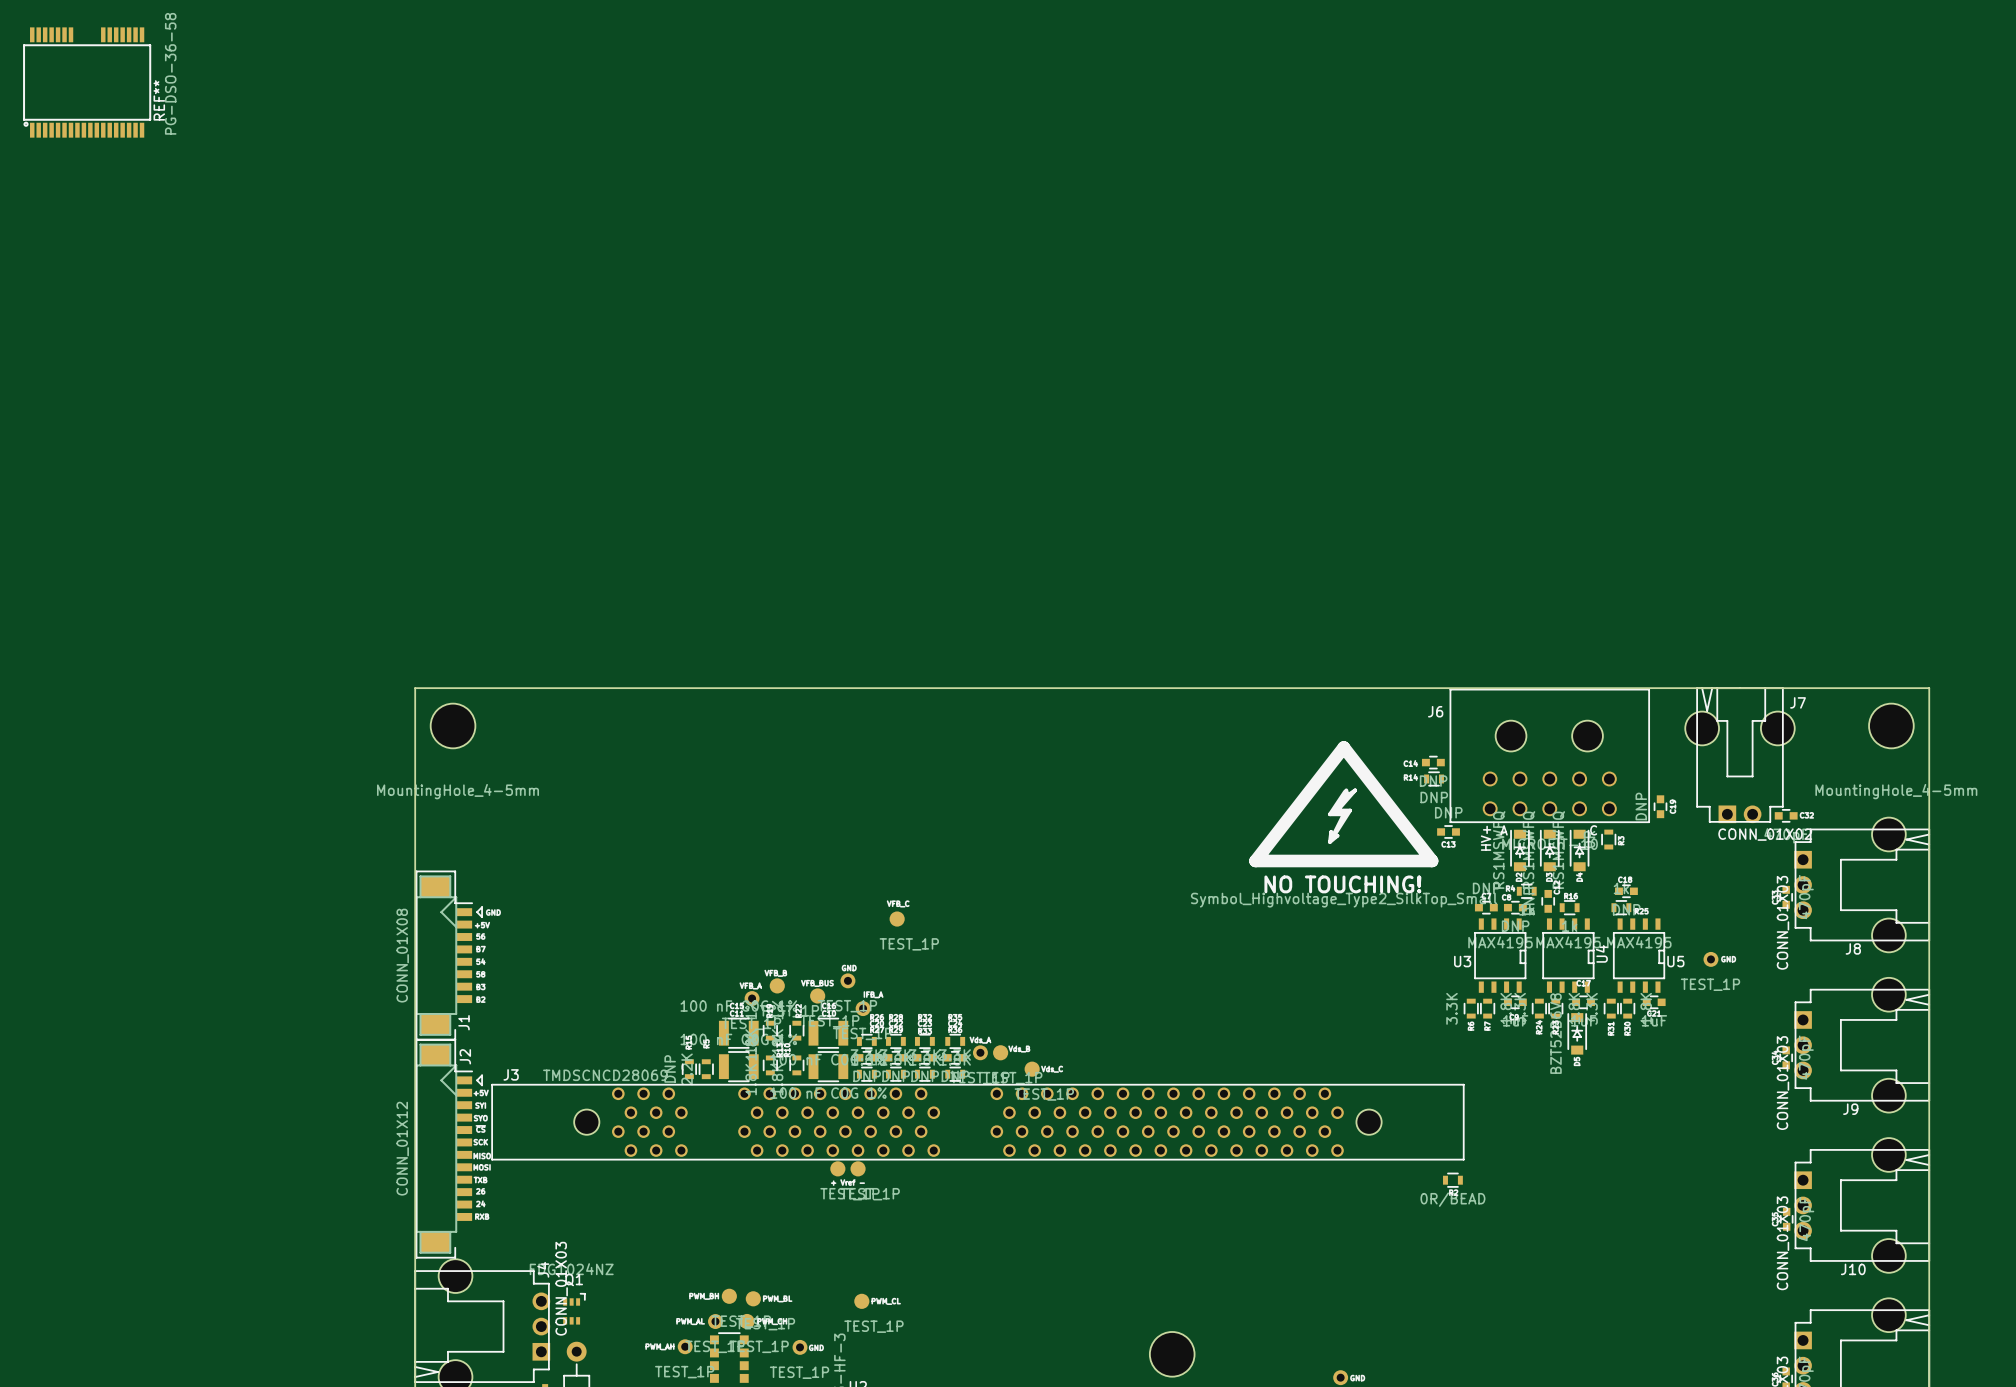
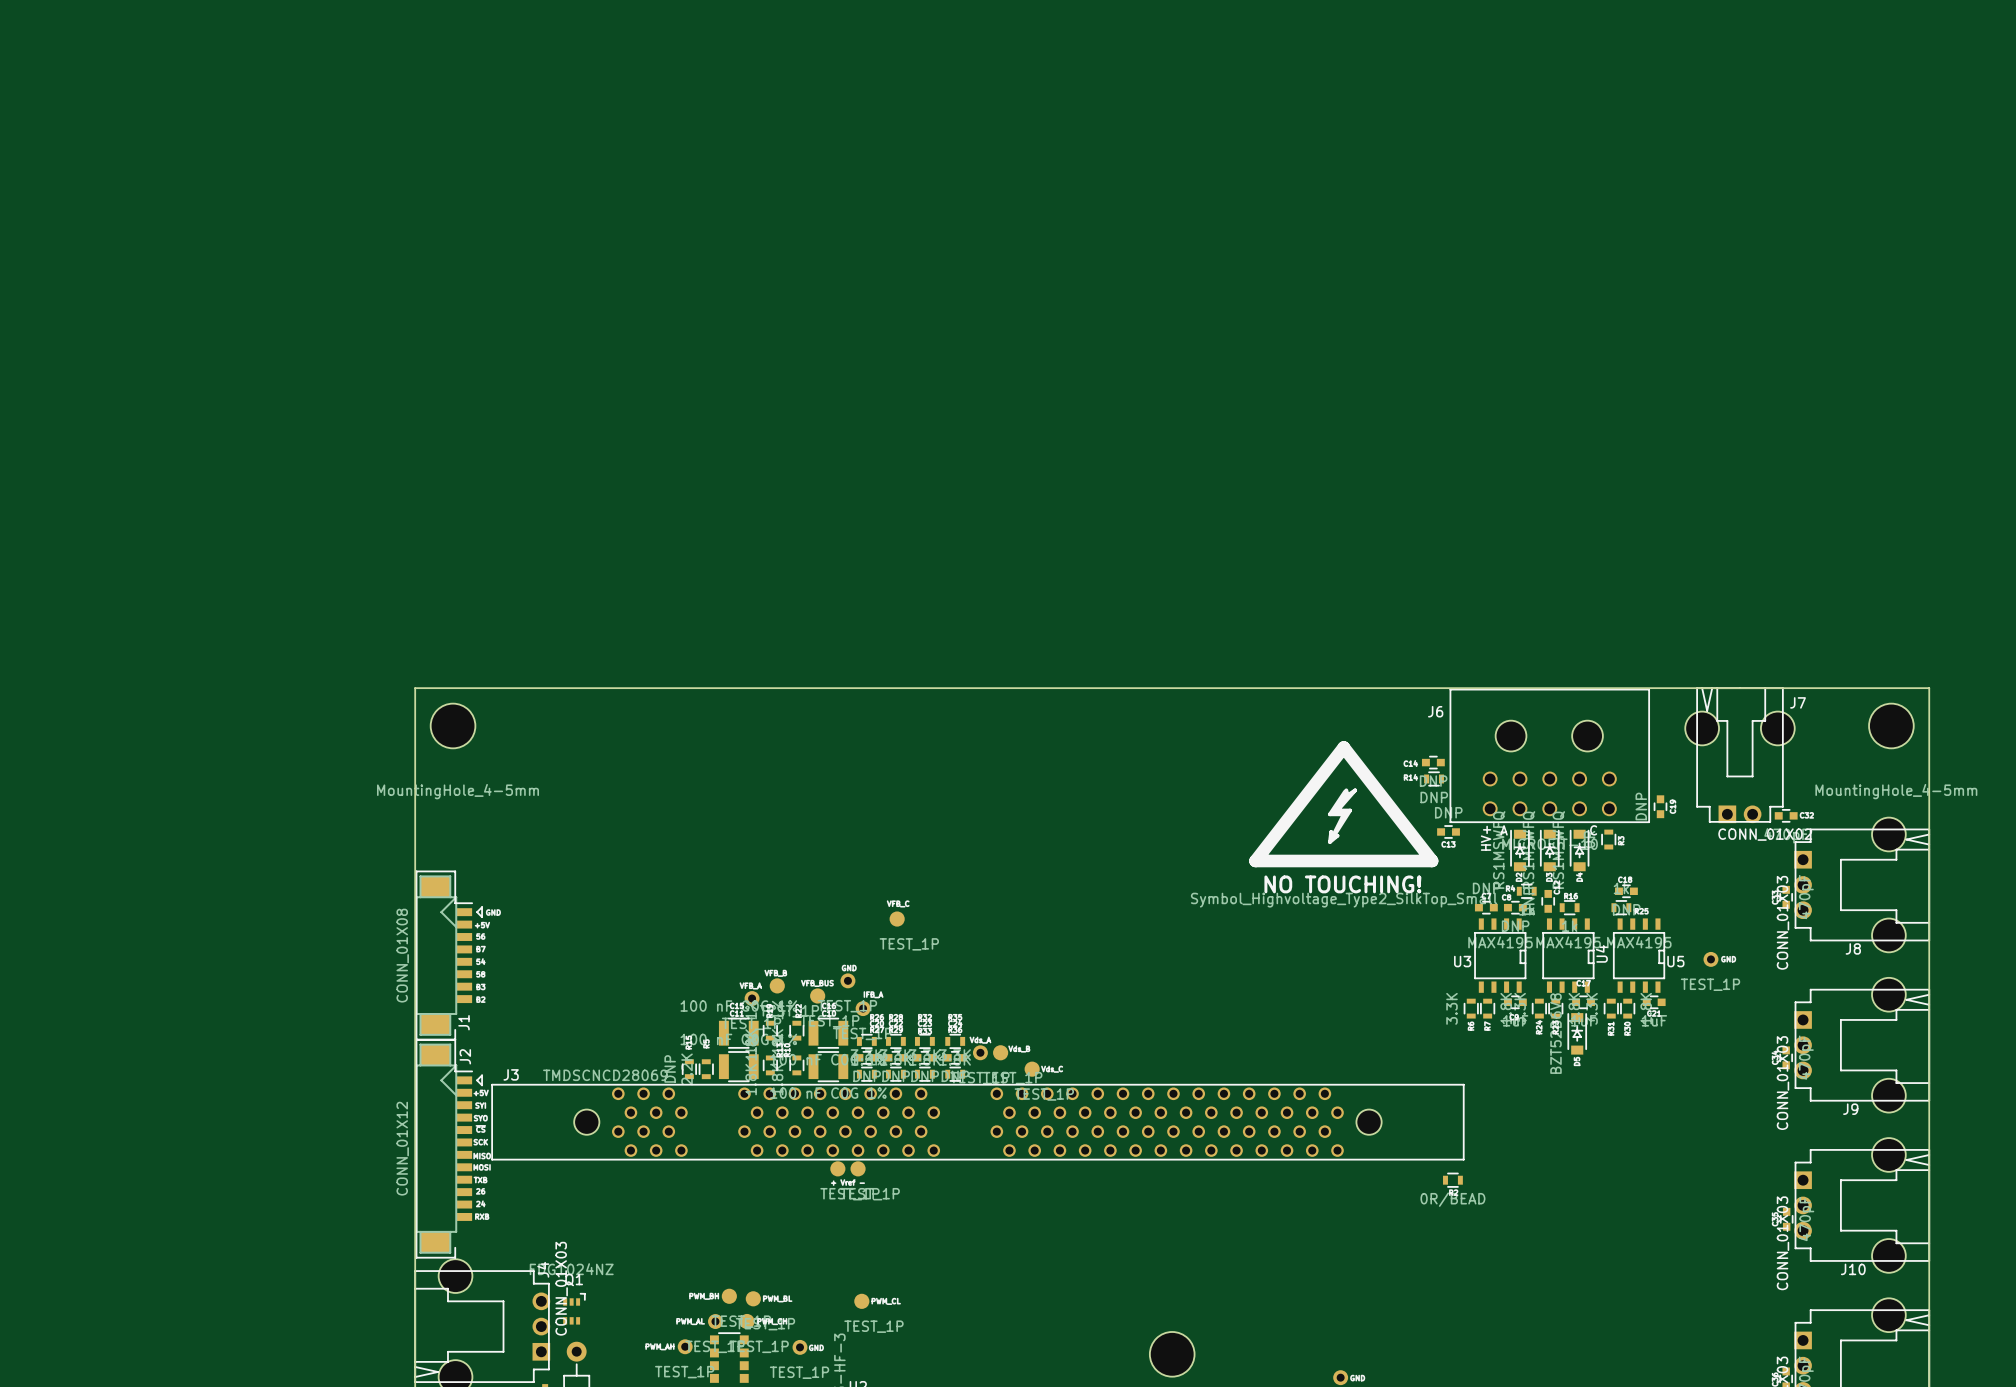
REF**: PG-DSO-36-58 (87, 82) -> none

